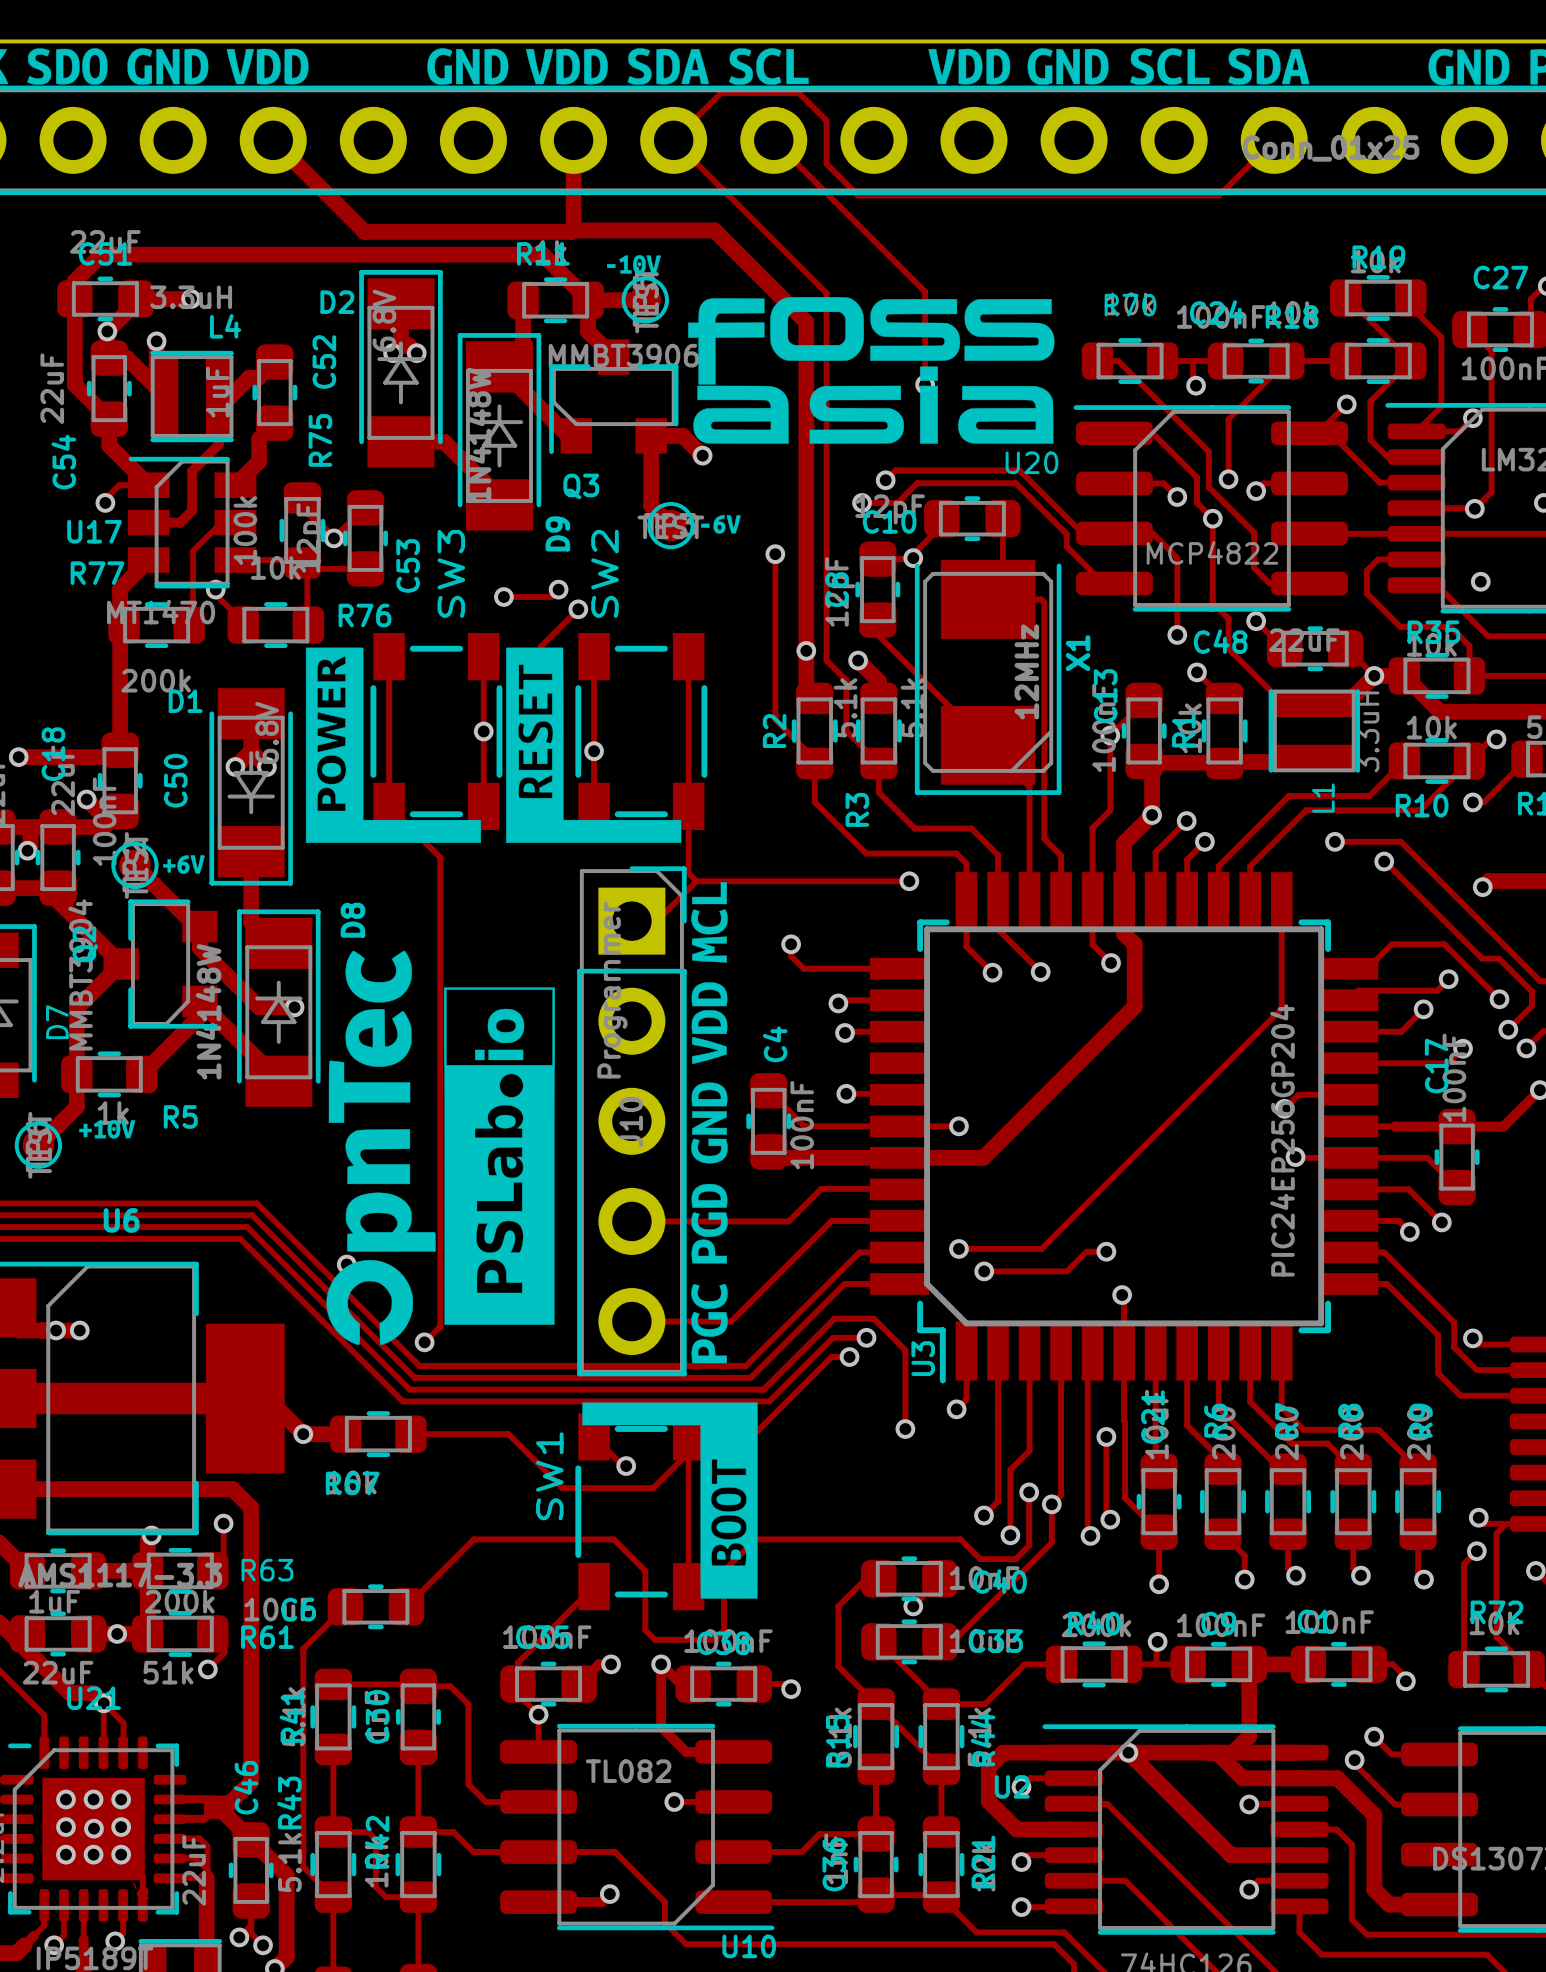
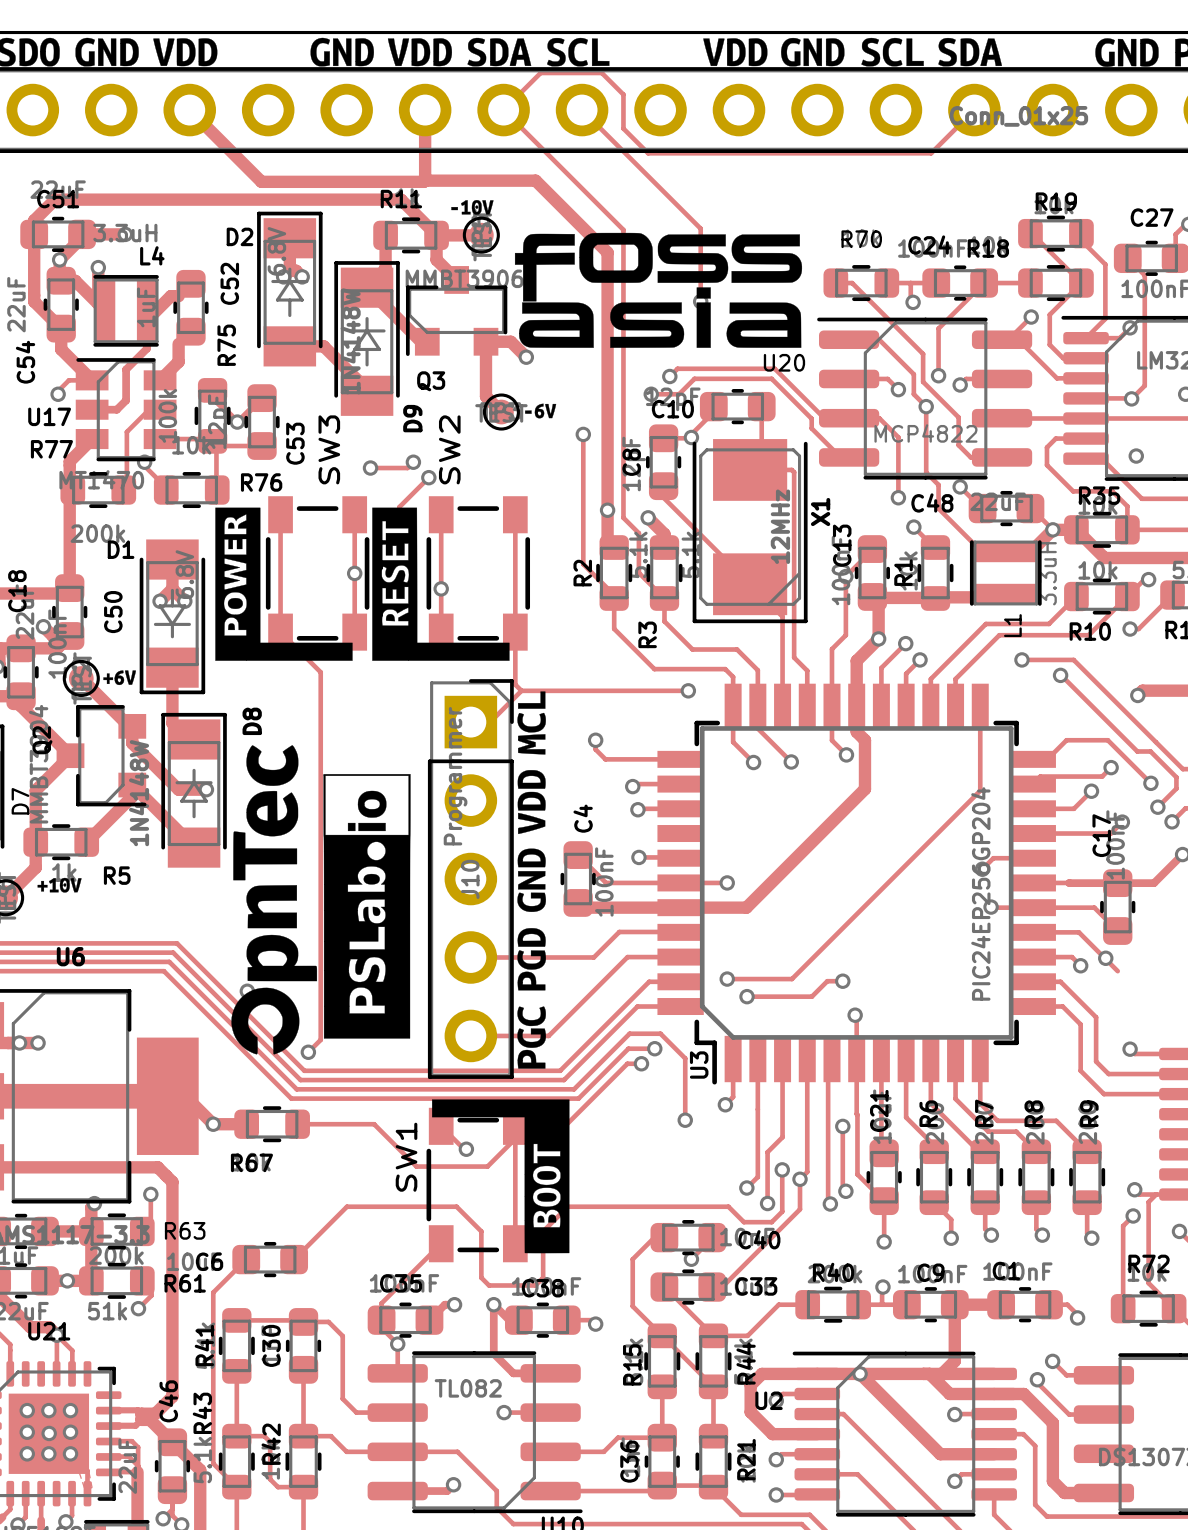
track: (1407, 1189) (1441, 1222) -> (1078, 932) (1117, 971)
track: (1429, 1297) (1454, 1322) (1454, 1347) (1476, 1370) -> (1096, 1017) (1096, 1061) (1108, 1074) (1133, 1074)
track: (1409, 1306) (1438, 1335) (1438, 1373) (1460, 1395) -> (1080, 1024) (1080, 1070) (1103, 1094) (1120, 1094)

